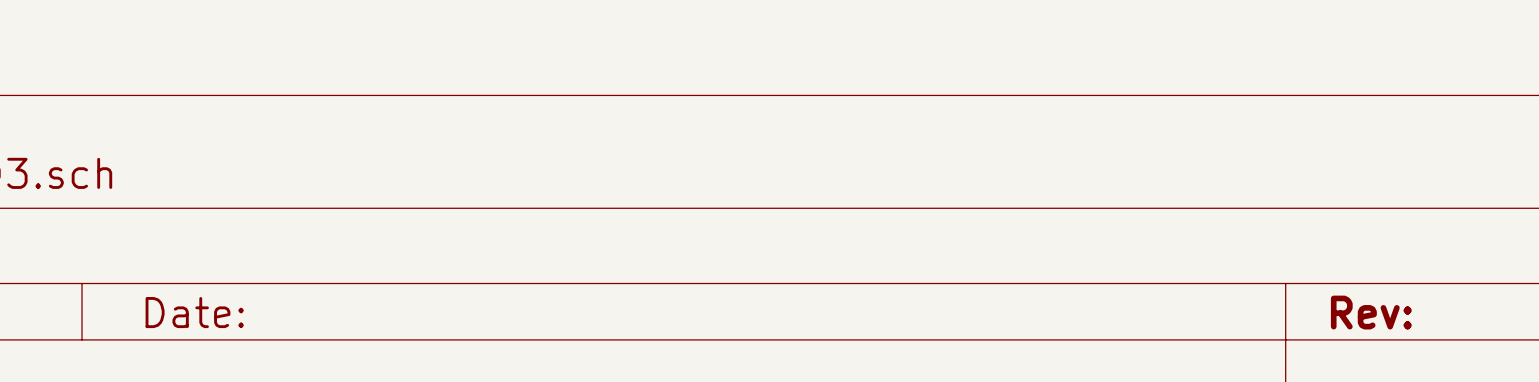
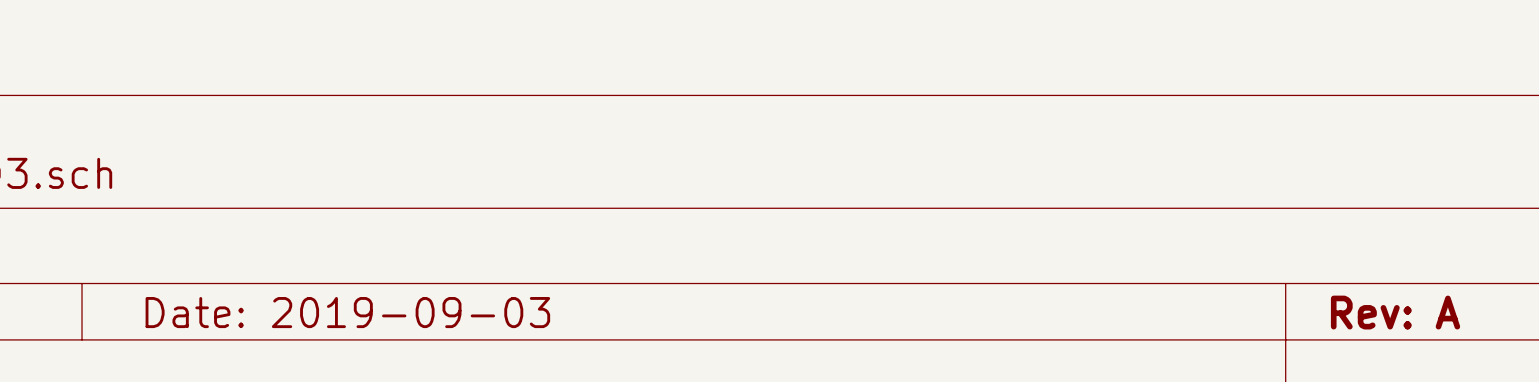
title block: Date: (194, 312) -> Date: 2019-09-03 (347, 312)
title block: Rev: (1371, 312) -> Rev: A (1395, 312)

